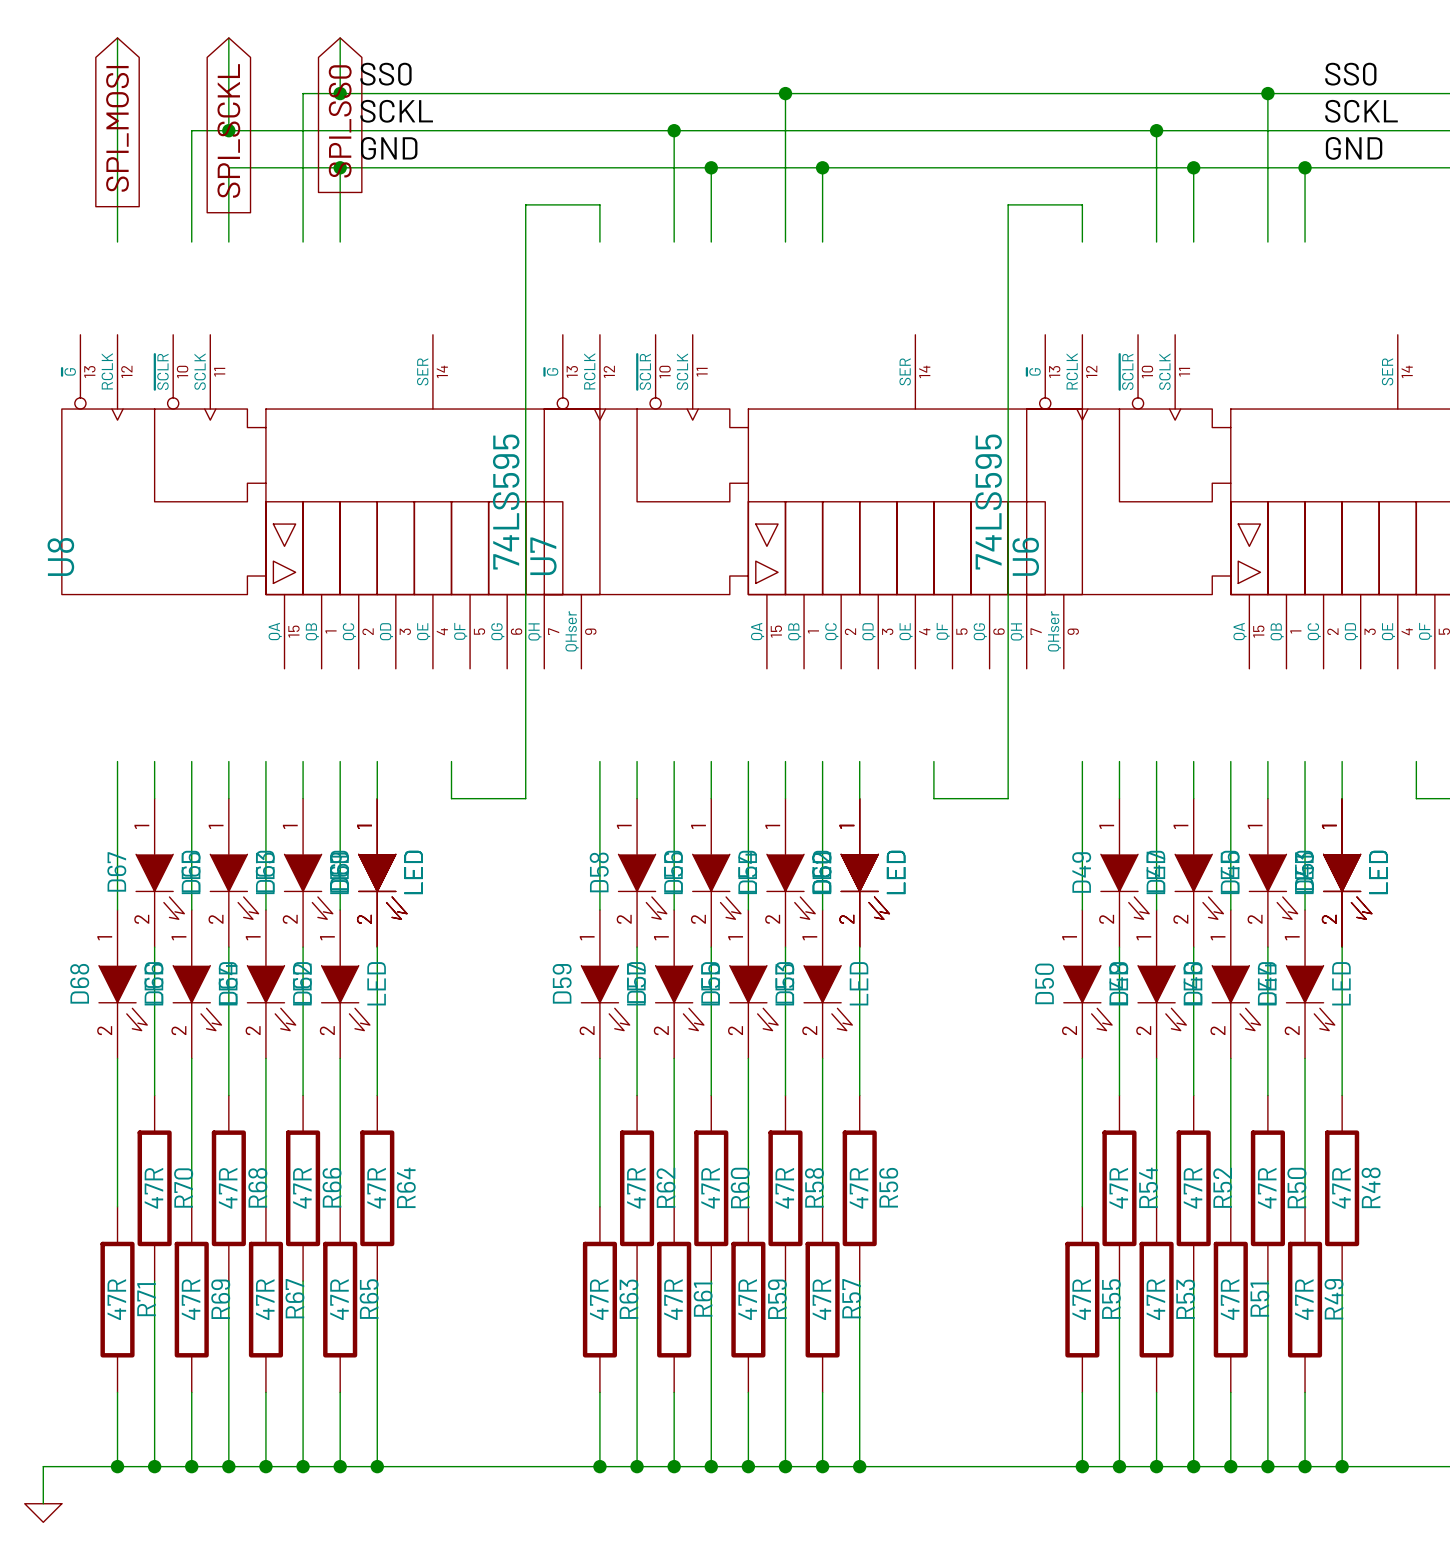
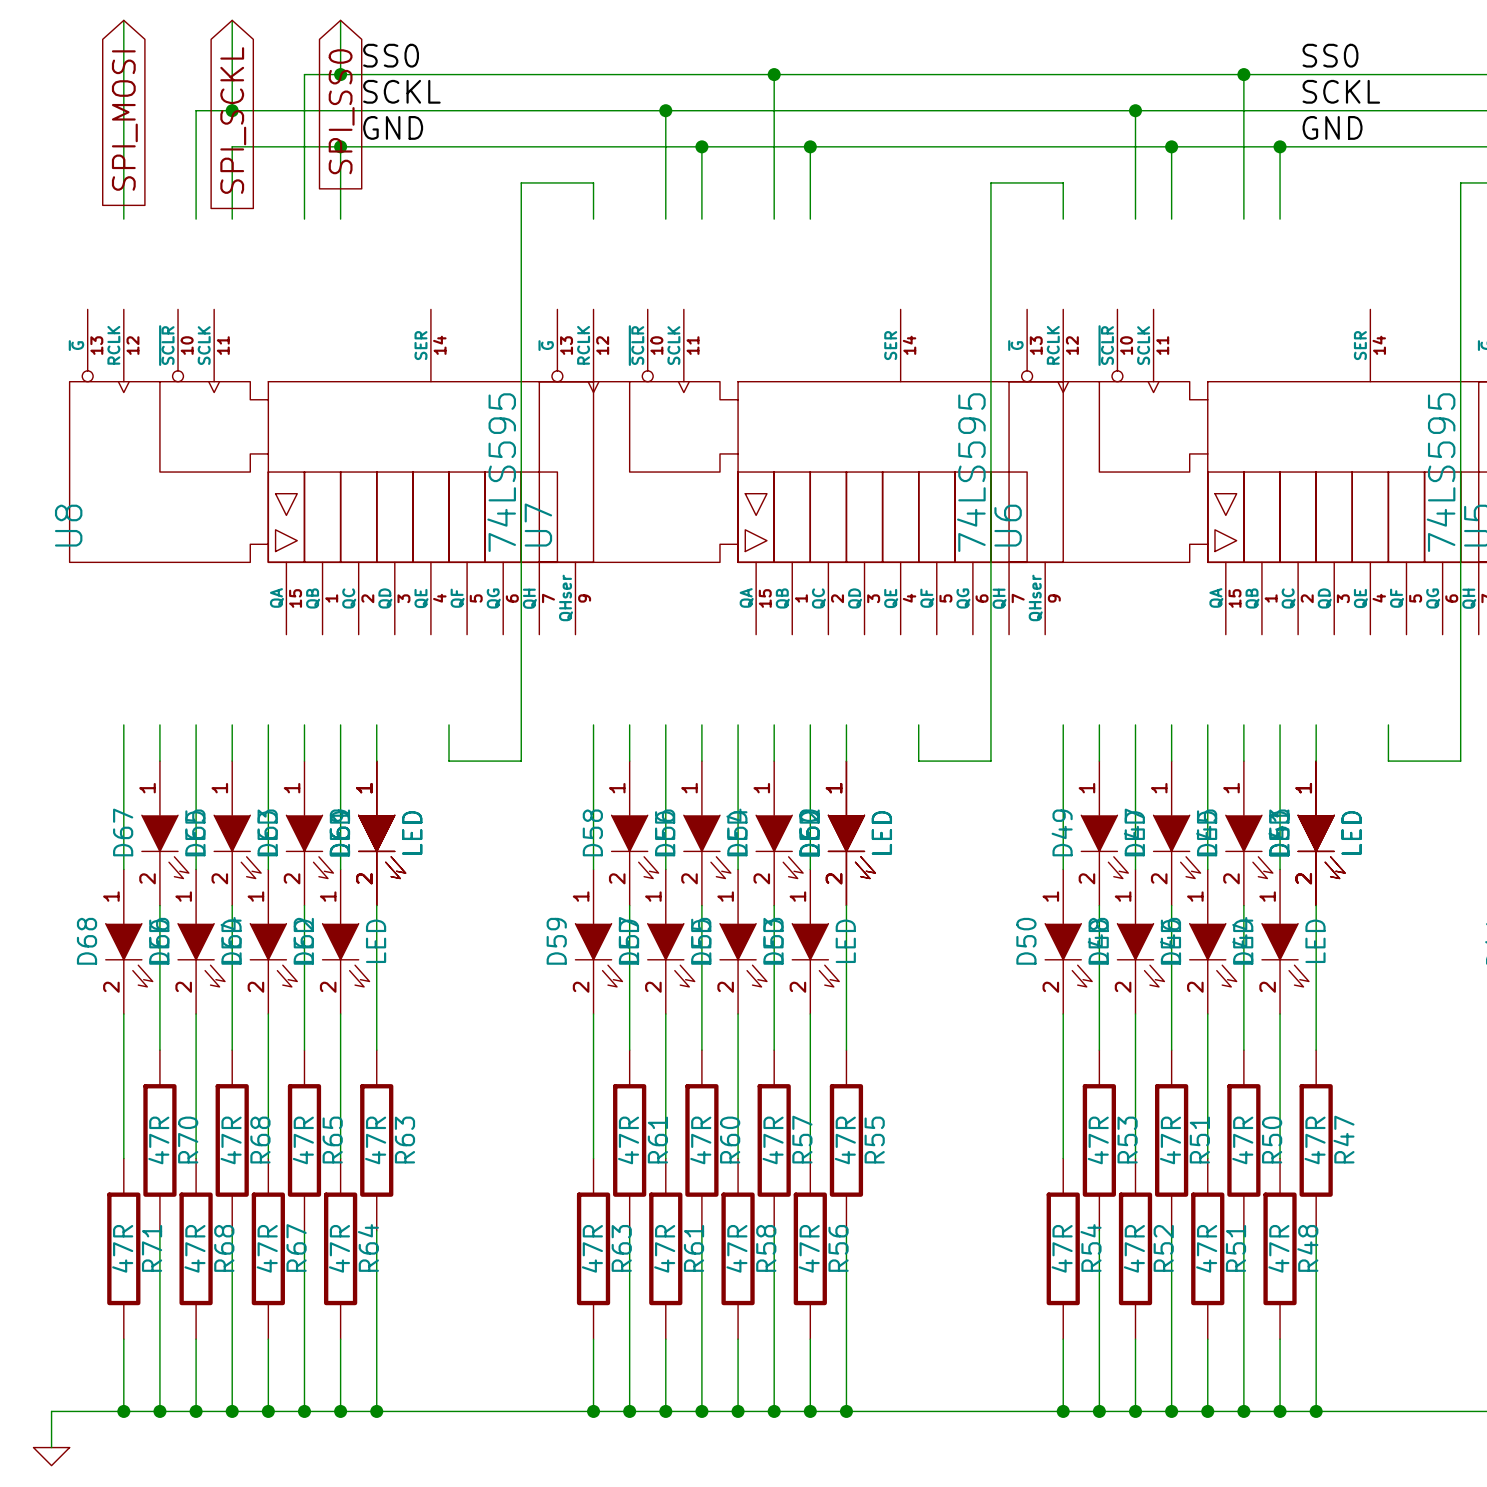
R66 name: R66 (332, 1187) -> R65 (332, 1140)
R64 name: R64 (406, 1187) -> R63 (404, 1140)
R62 name: R62 (666, 1187) -> R61 (657, 1140)
R58 name: R58 (814, 1187) -> R57 (802, 1139)
R56 name: R56 (888, 1187) -> R55 (874, 1140)
R54 name: R54 (1148, 1187) -> R53 (1127, 1140)
R52 name: R52 (1222, 1187) -> R51 (1199, 1140)
R48 name: R48 (1371, 1187) -> R47 (1343, 1139)
R57 name: R57 (851, 1298) -> R56 (838, 1248)
R69 name: R69 (220, 1299) -> R68 (224, 1248)
R65 name: R65 (369, 1299) -> R64 (368, 1247)
R59 name: R59 (777, 1299) -> R58 (766, 1248)
R55 name: R55 (1111, 1299) -> R54 (1091, 1247)
R53 name: R53 (1185, 1299) -> R52 (1163, 1248)
R49 name: R49 (1334, 1299) -> R48 (1307, 1248)

